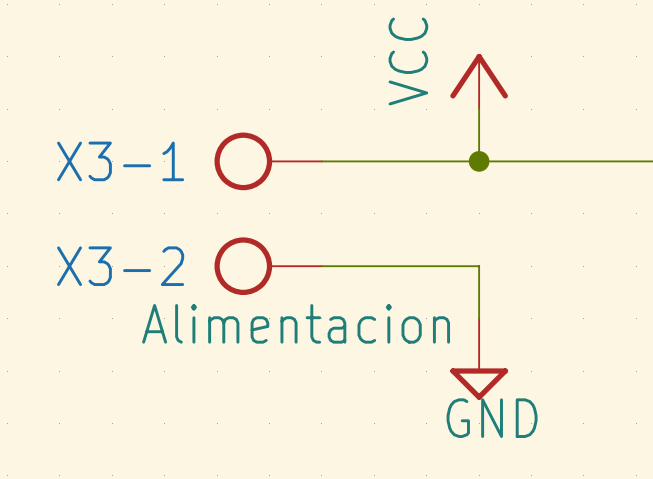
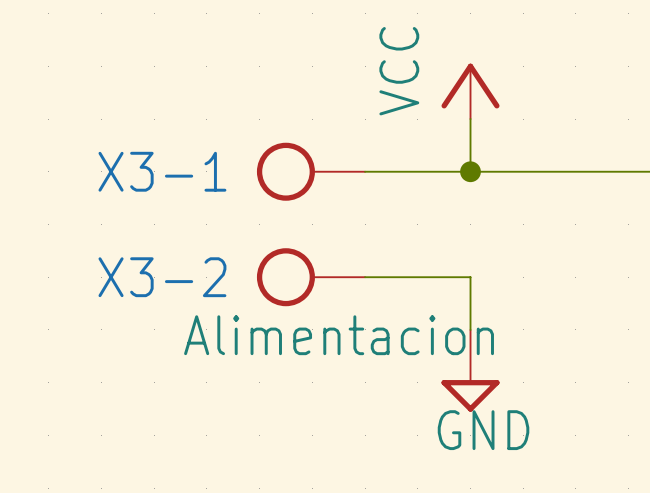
X3-1 position: (268, 161) -> (310, 171)
X3-2 position: (268, 266) -> (310, 277)

